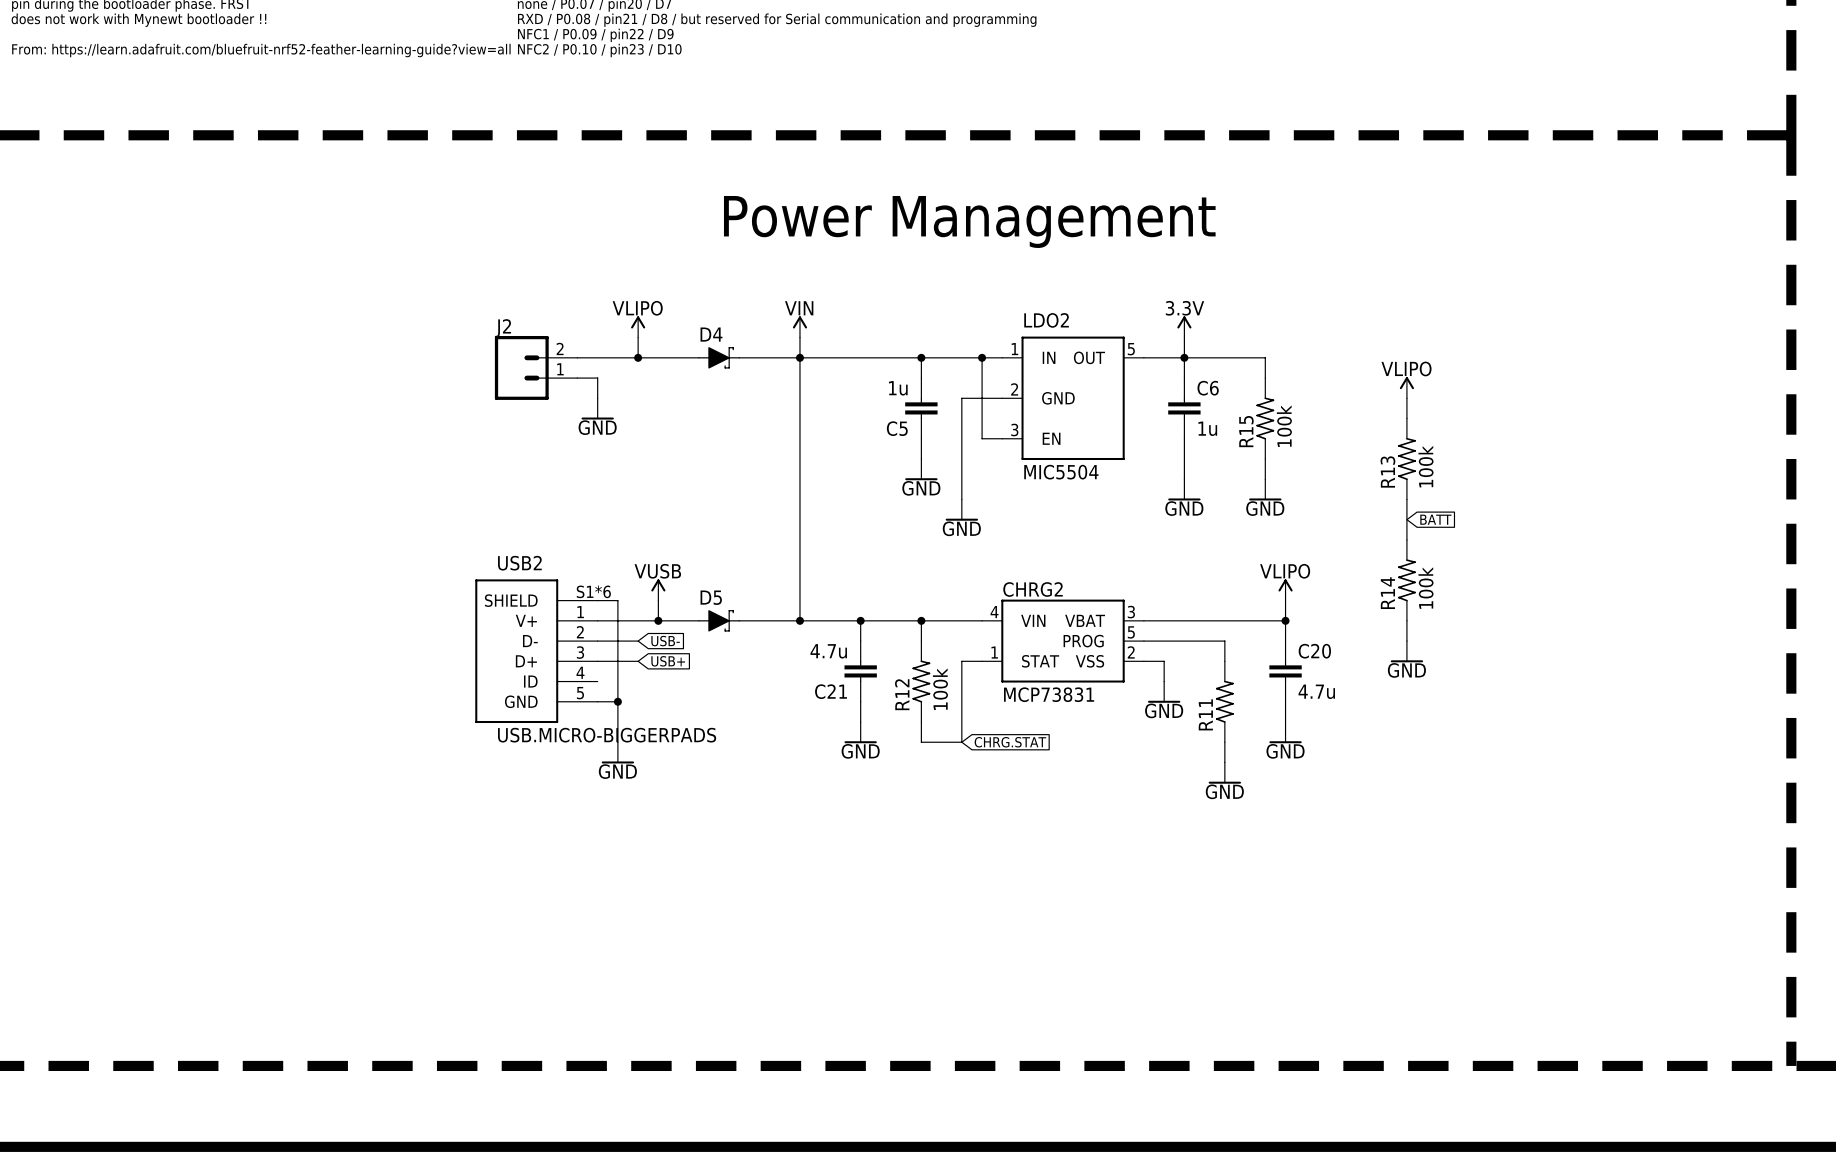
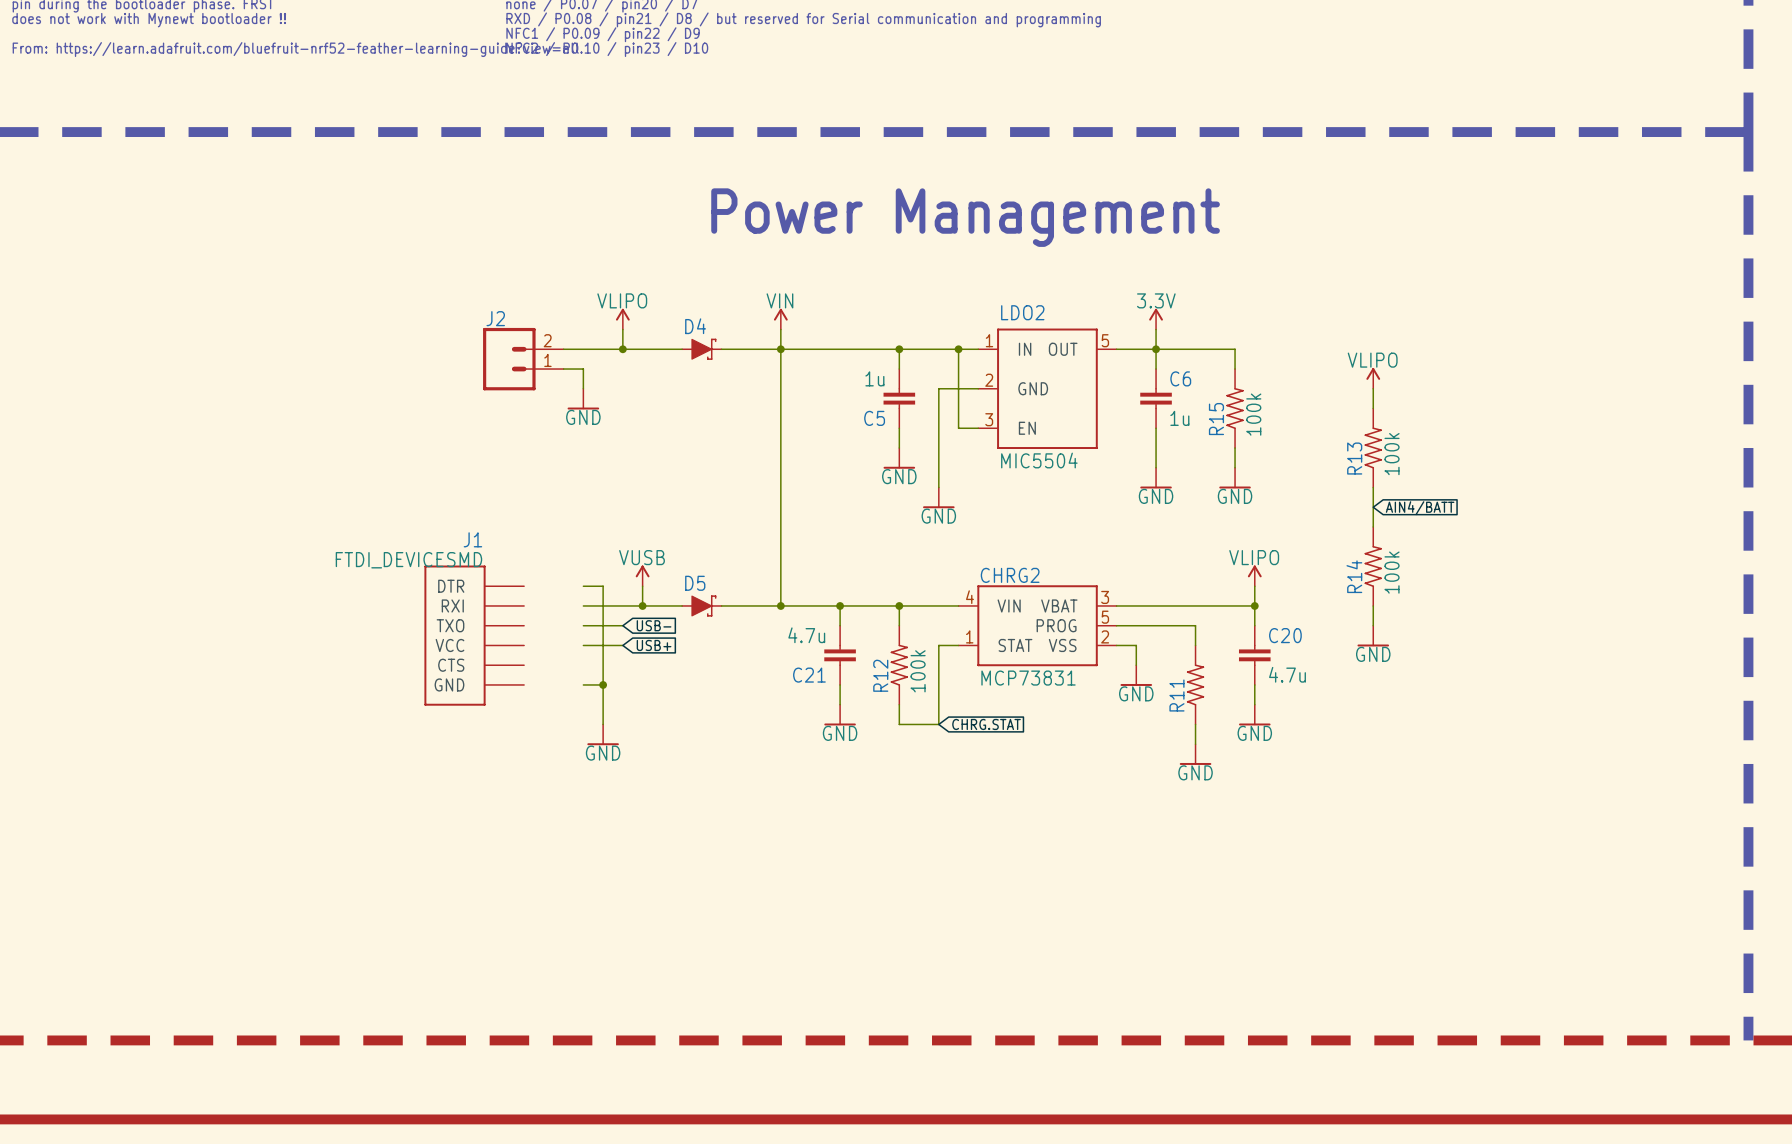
global label: BATT (1435, 519) -> AIN4/BATT (1420, 508)
J1: none -> FTDI_DEVICESMD (474, 635)
USB2: USB.MICRO-BIGGERPADS (536, 651) -> none

